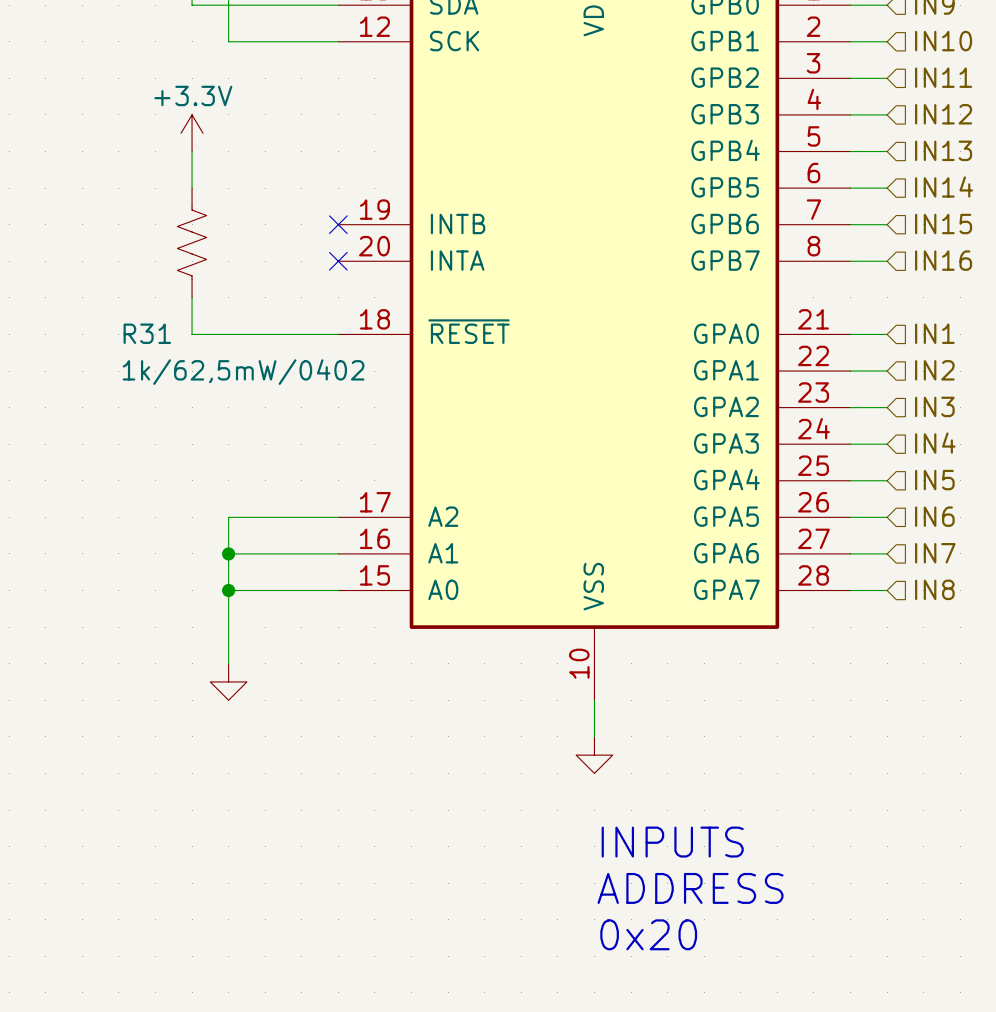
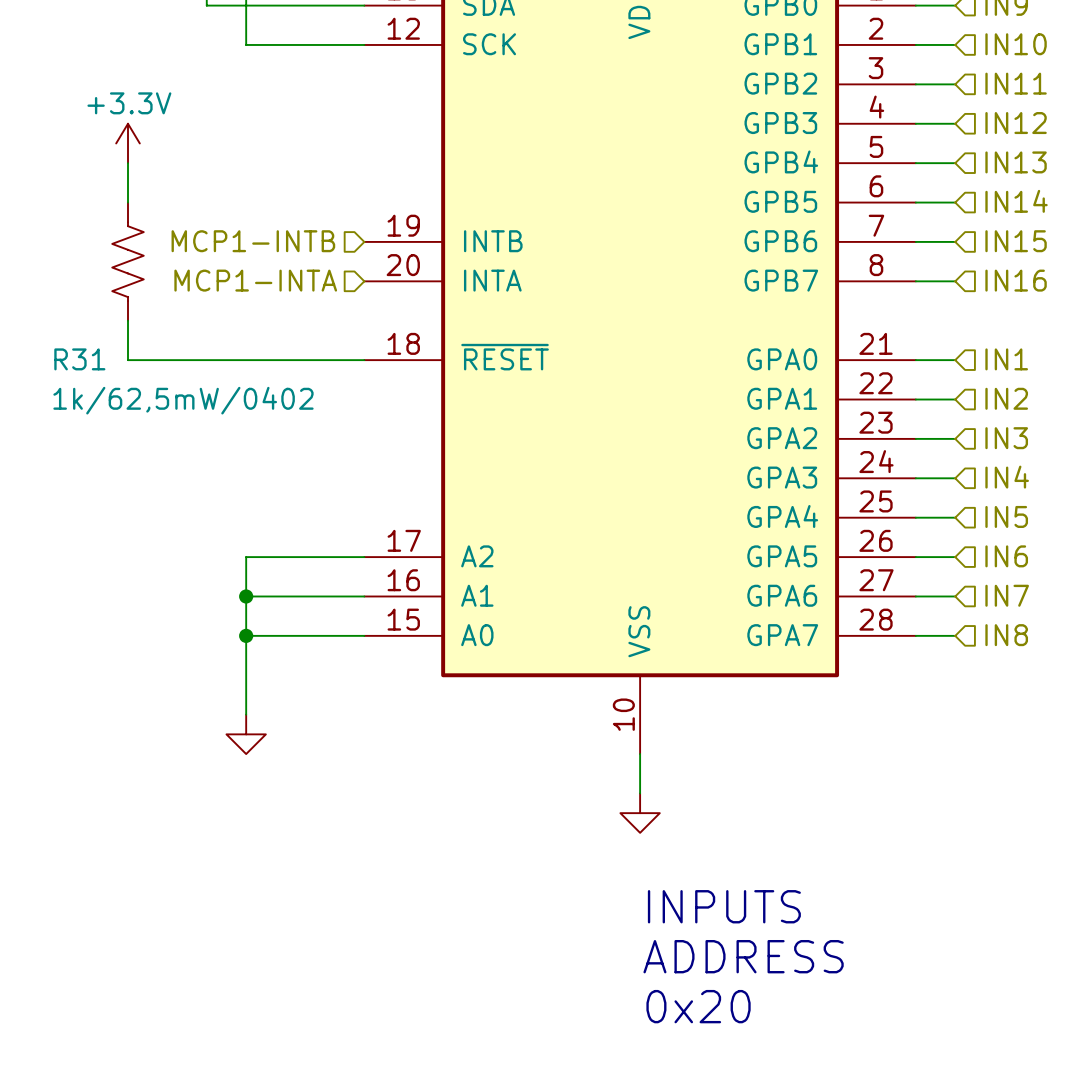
power symbol position: +3.3V (192, 133) -> +3.3V (128, 143)
wire: (192, 151) (192, 188) -> (128, 163) (128, 202)
hierarchical label: none -> MCP1-INTB (253, 241)
no-connect mark: (338, 224) -> none
R31 position: (192, 242) -> (128, 261)
hierarchical label: none -> MCP1-INTA (255, 280)
no-connect mark: (338, 261) -> none
wire: (192, 297) (192, 334) -> (128, 320) (128, 360) (206, 360)

